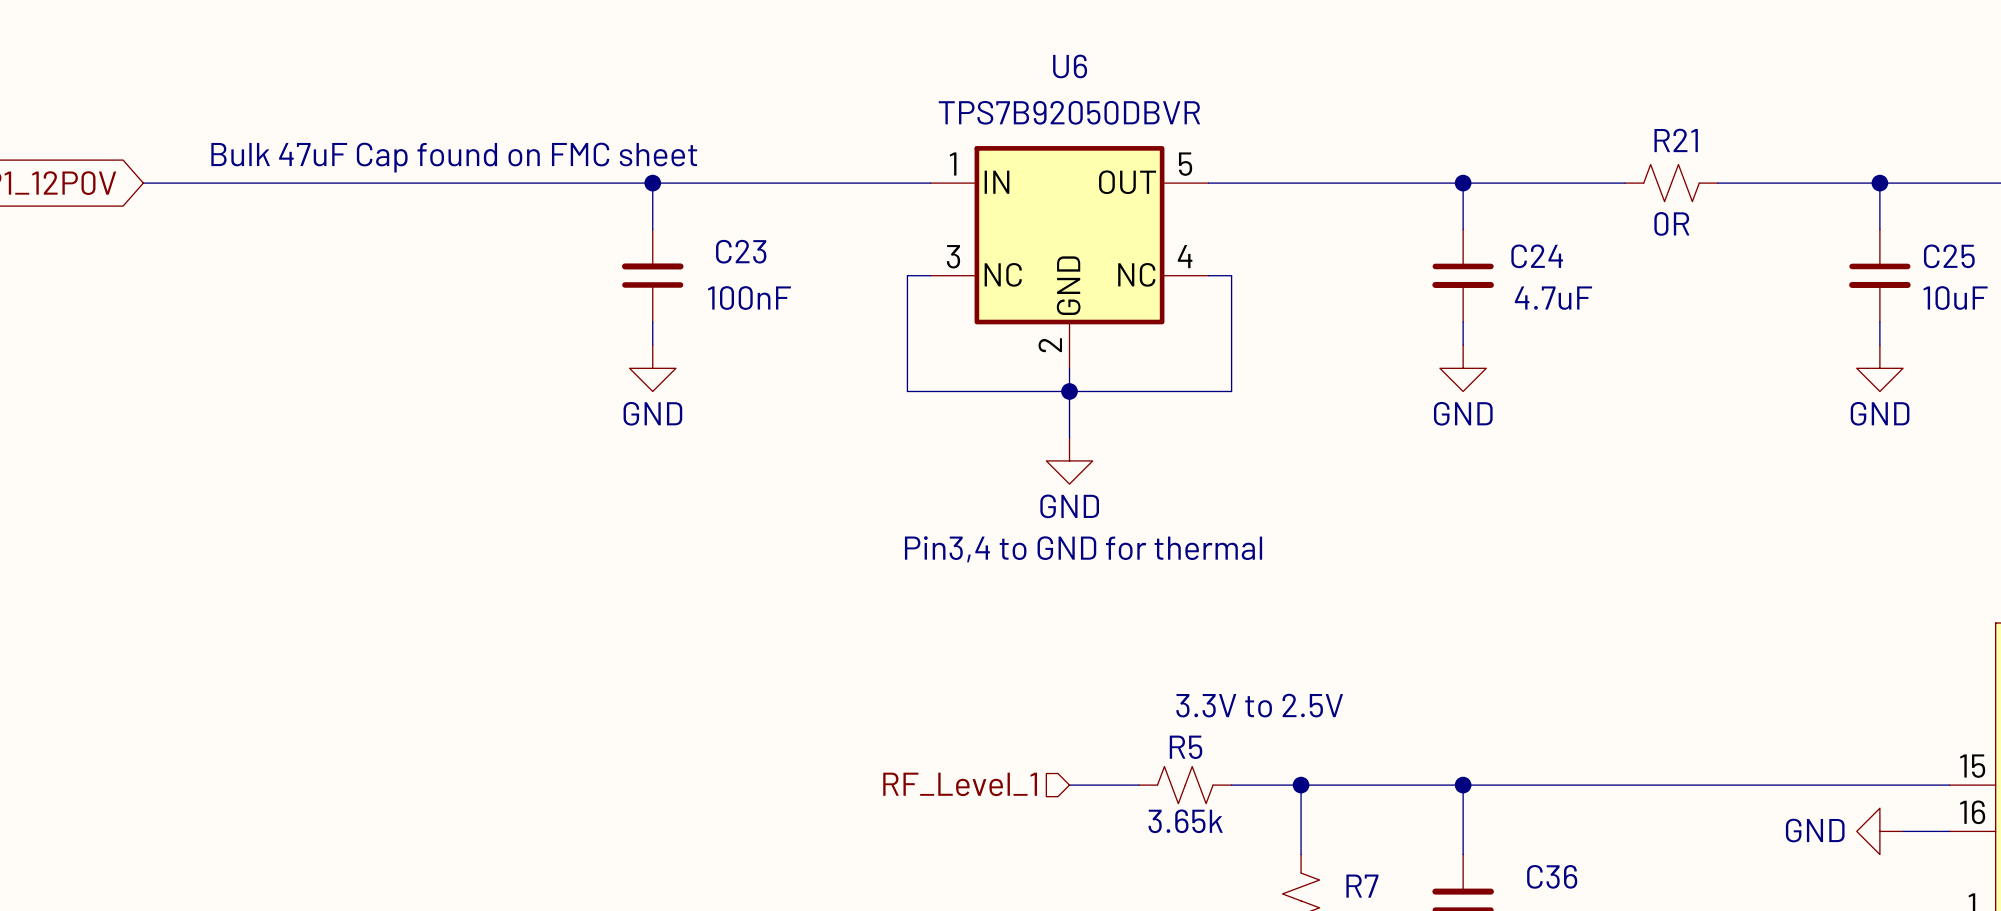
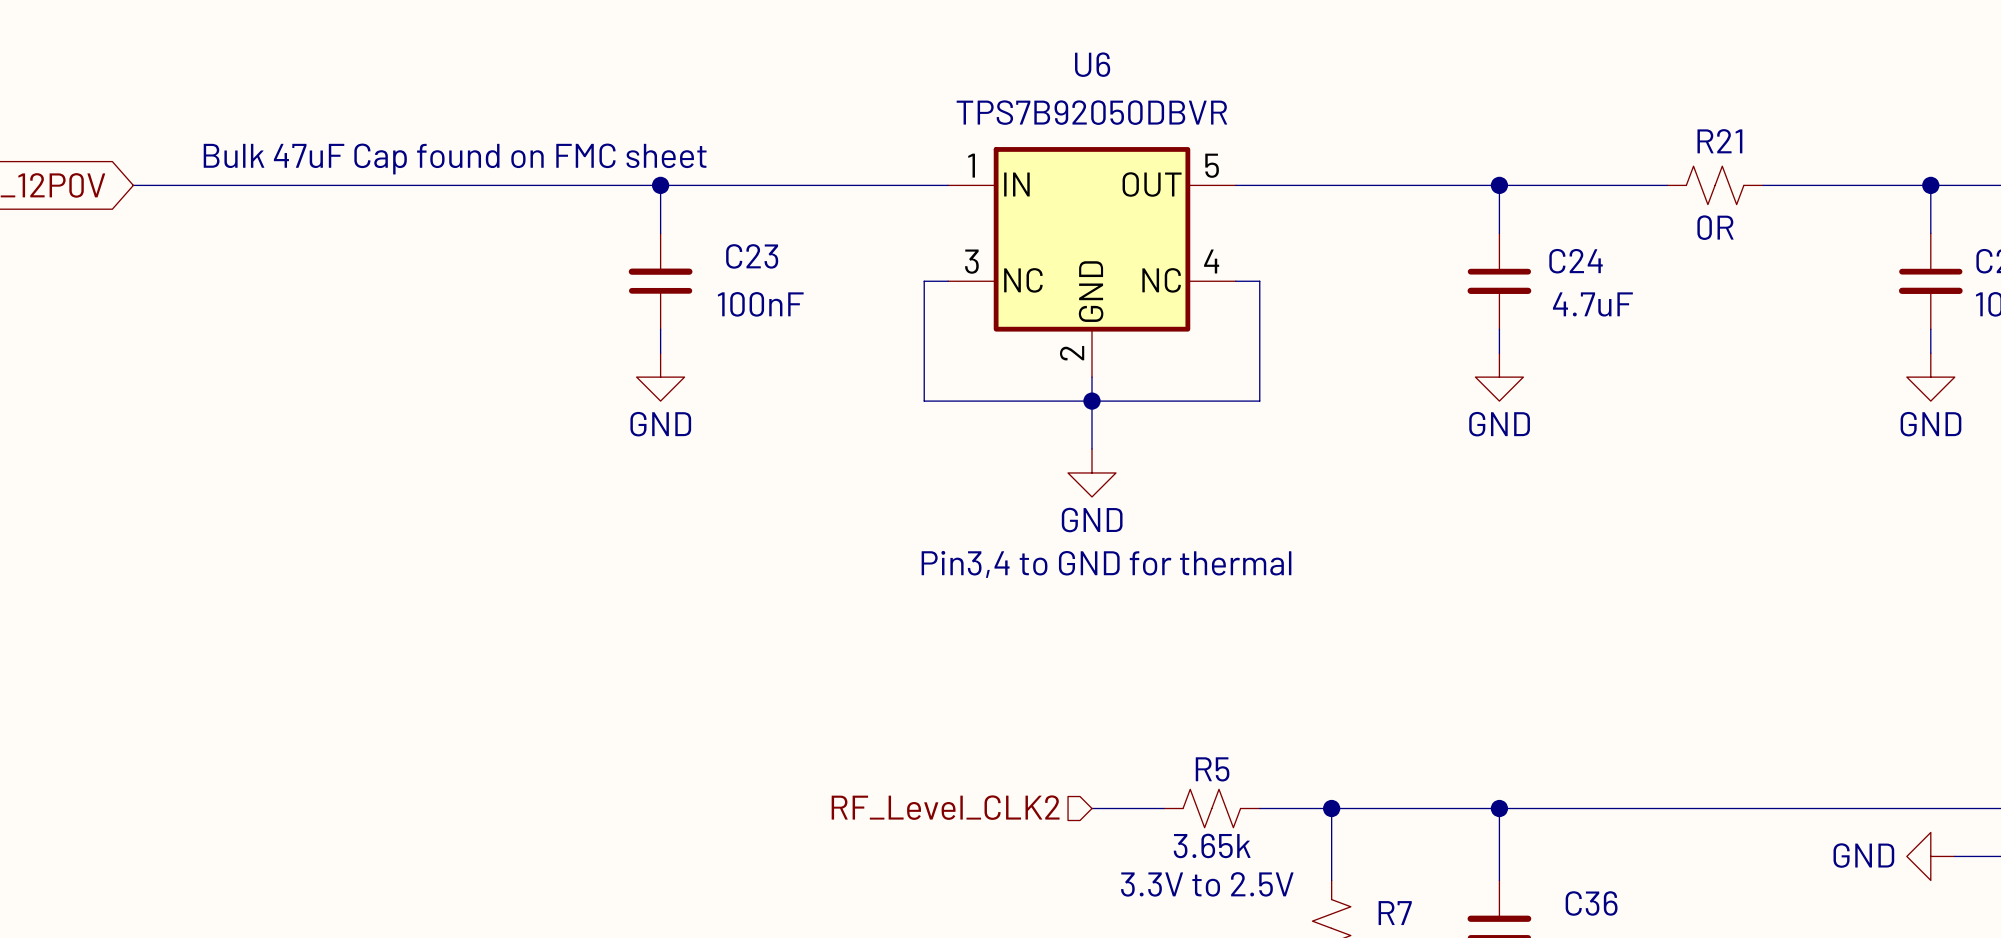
text position: 3.3V to 2.5V (1259, 705) -> 3.3V to 2.5V (1207, 884)
hierarchical label: RF_Level_1 (960, 784) -> RF_Level_CLK2 (945, 807)

